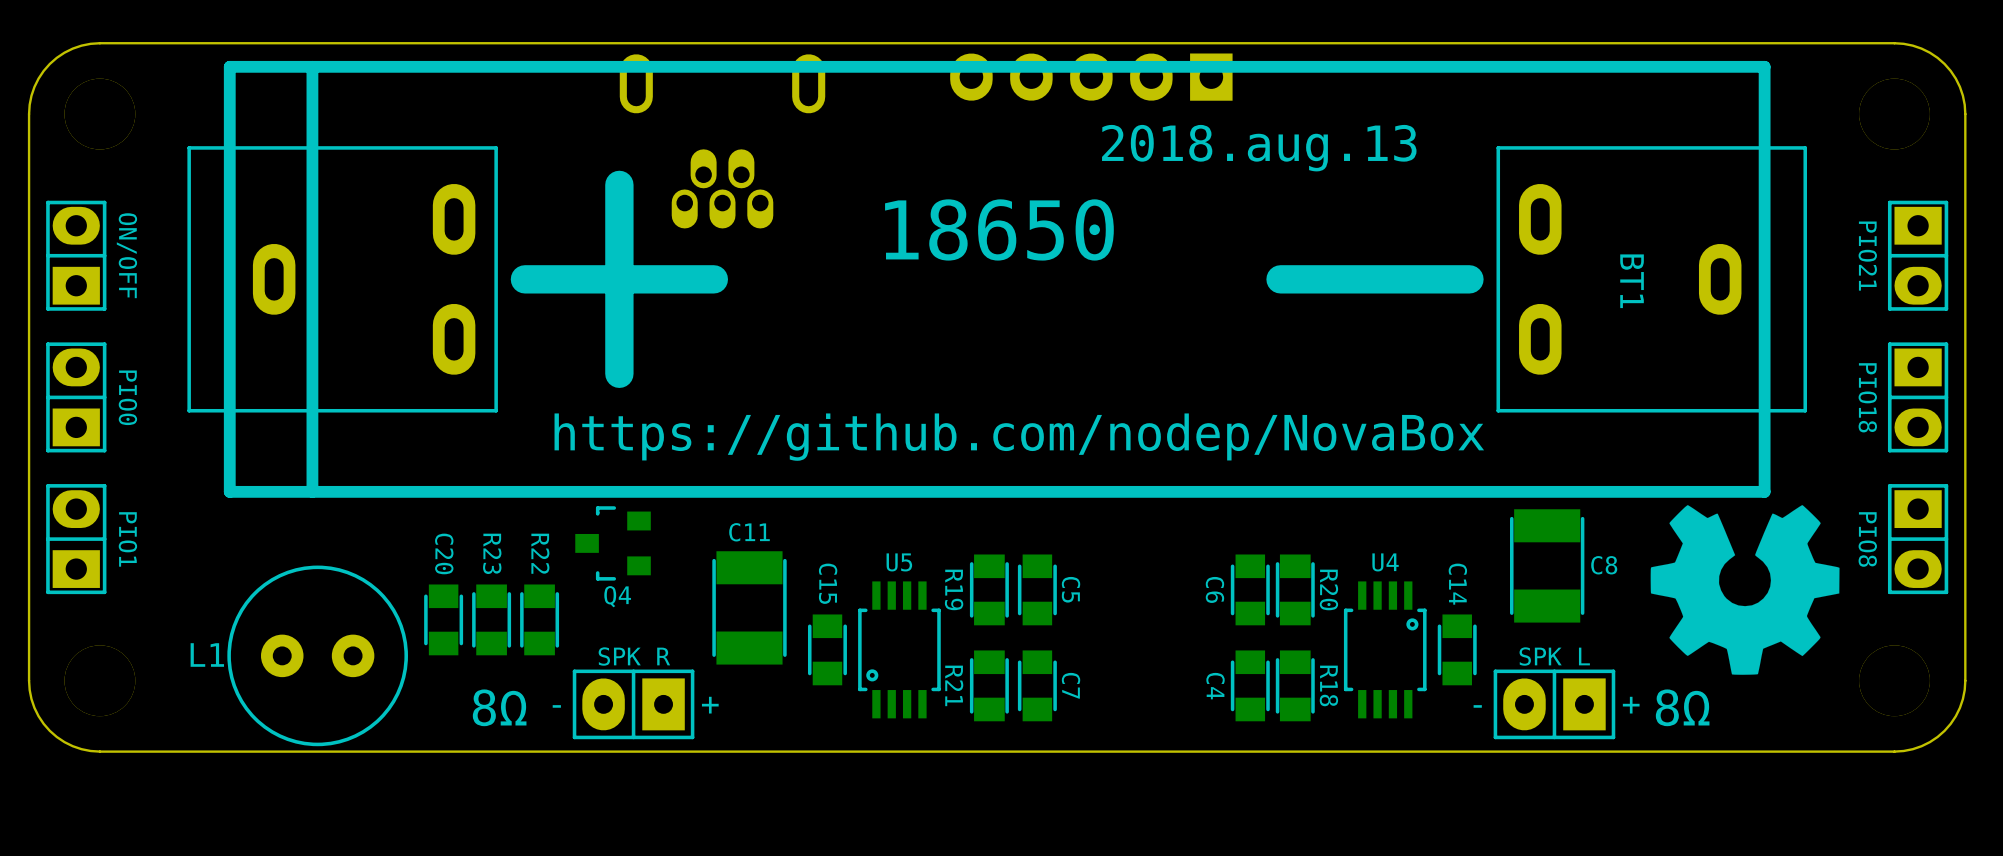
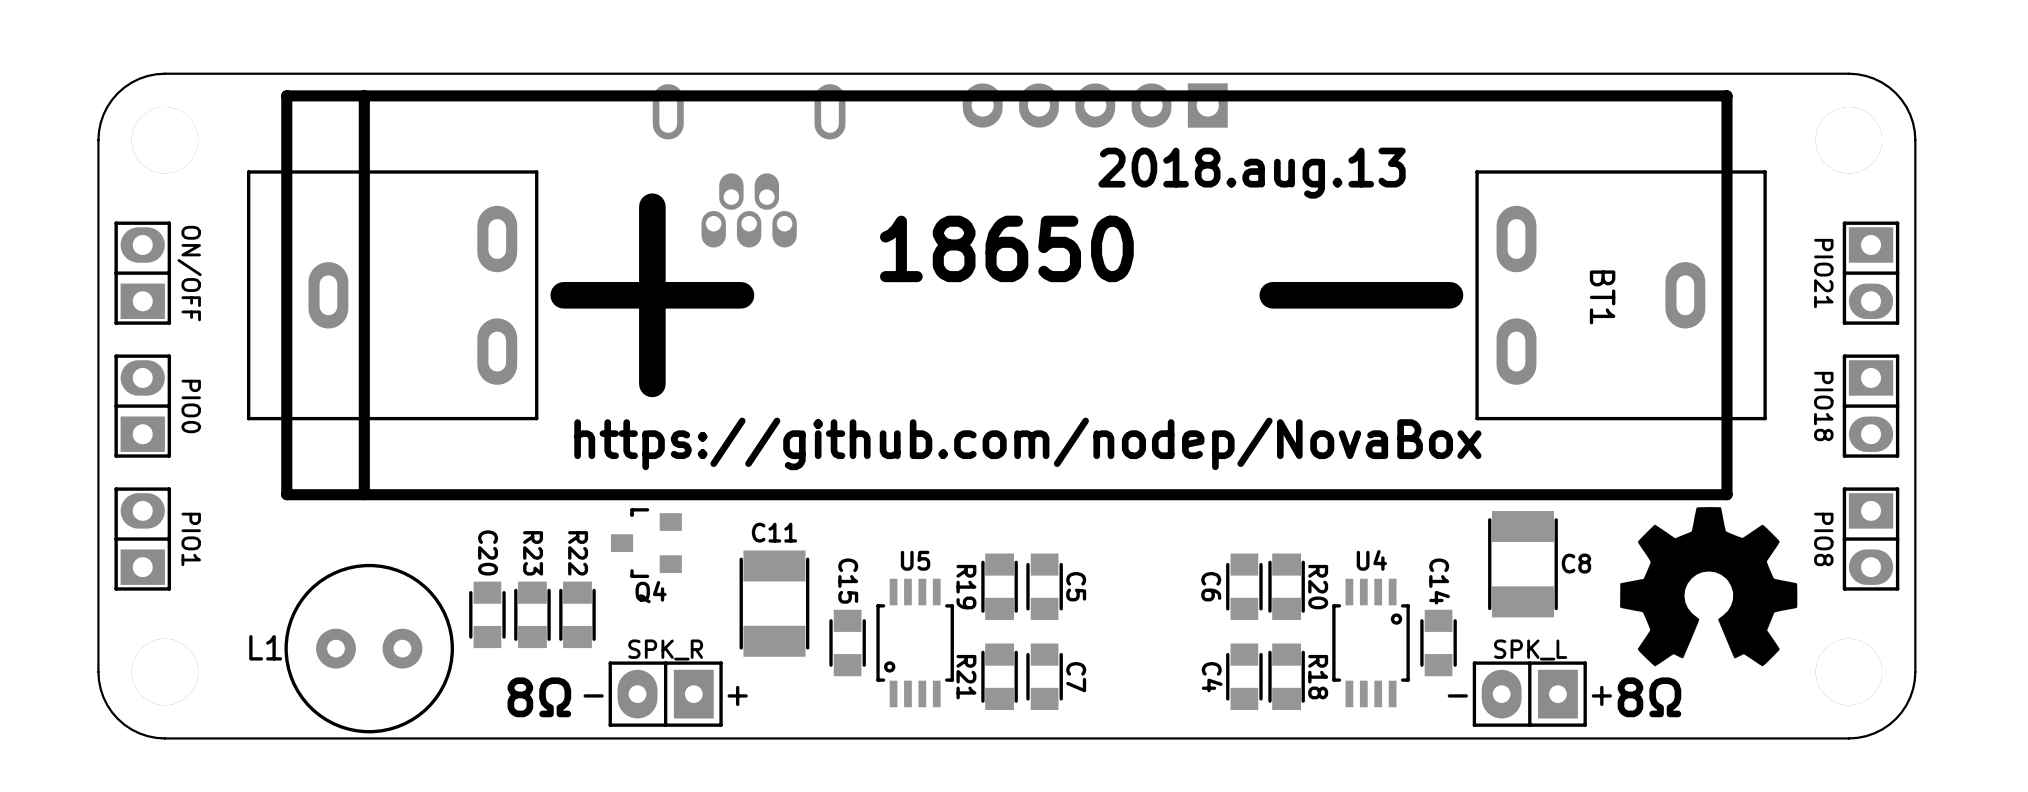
drawing shape: [1650, 505, 1840, 675] -> [1620, 507, 1798, 667]

